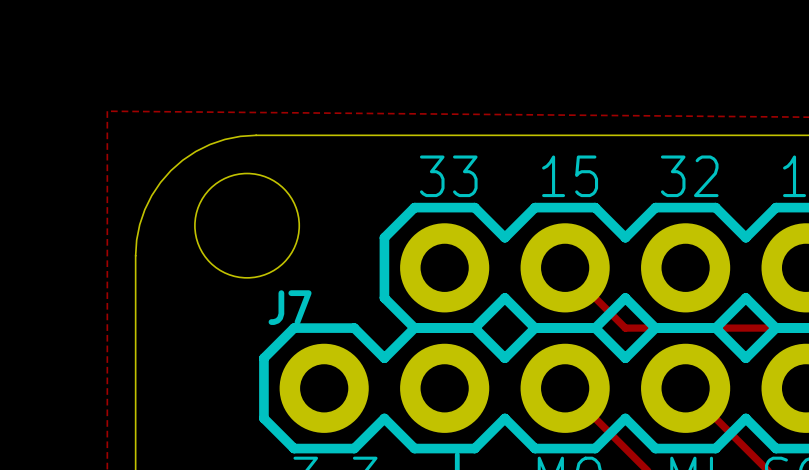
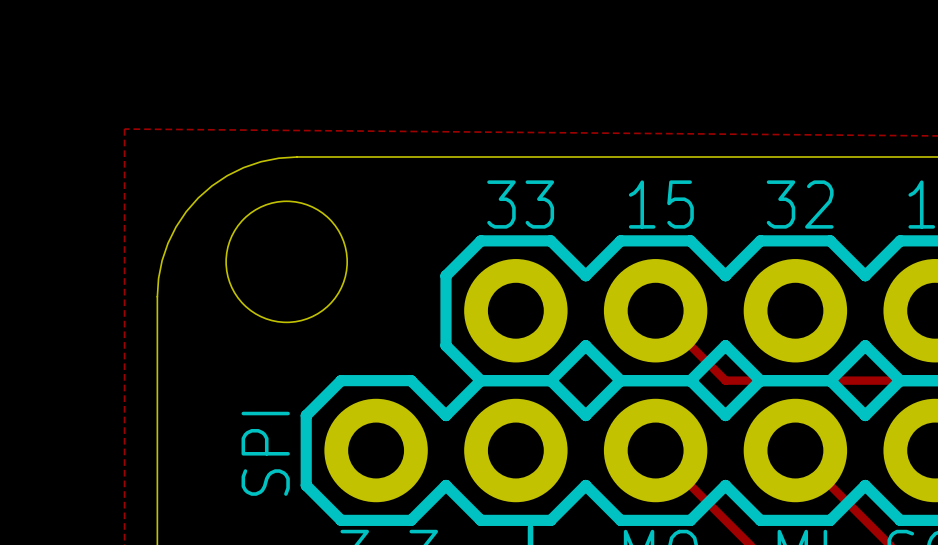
J7 name: J7 (290, 307) -> none
text: none -> SPI (265, 453)

